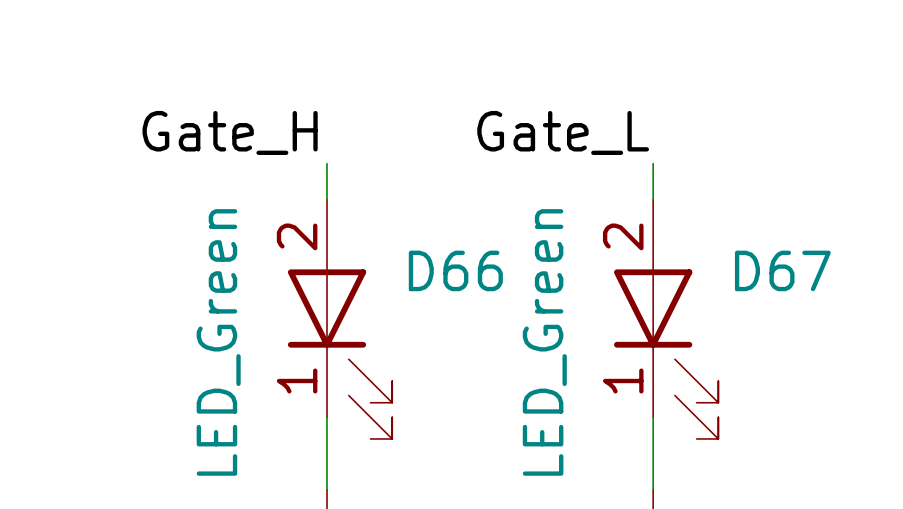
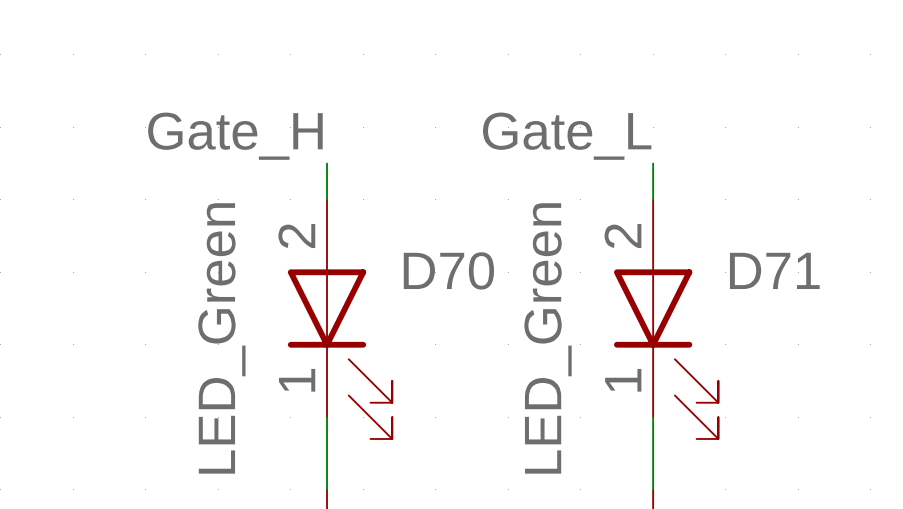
D66 name: D66 (455, 270) -> D70 (448, 270)
D67 name: D67 (782, 270) -> D71 (774, 270)

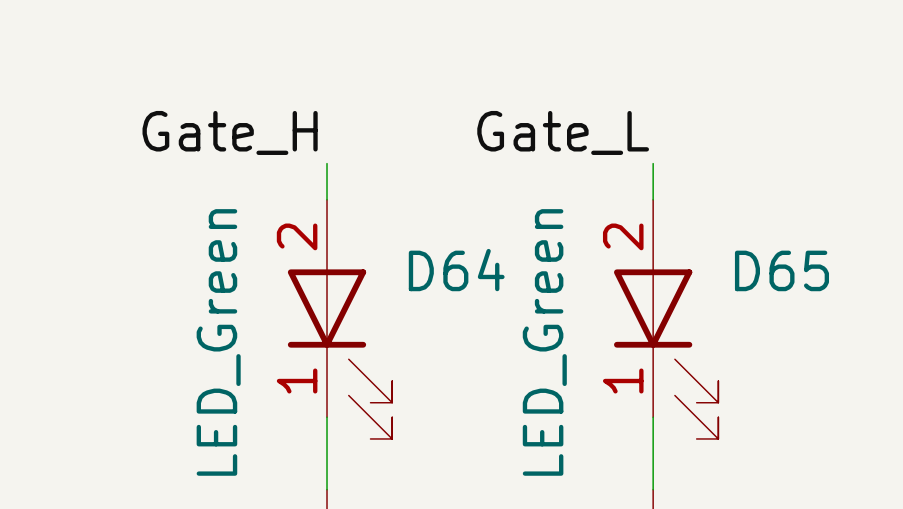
D70 name: D70 (448, 270) -> D64 (456, 270)
D71 name: D71 (774, 270) -> D65 (781, 270)

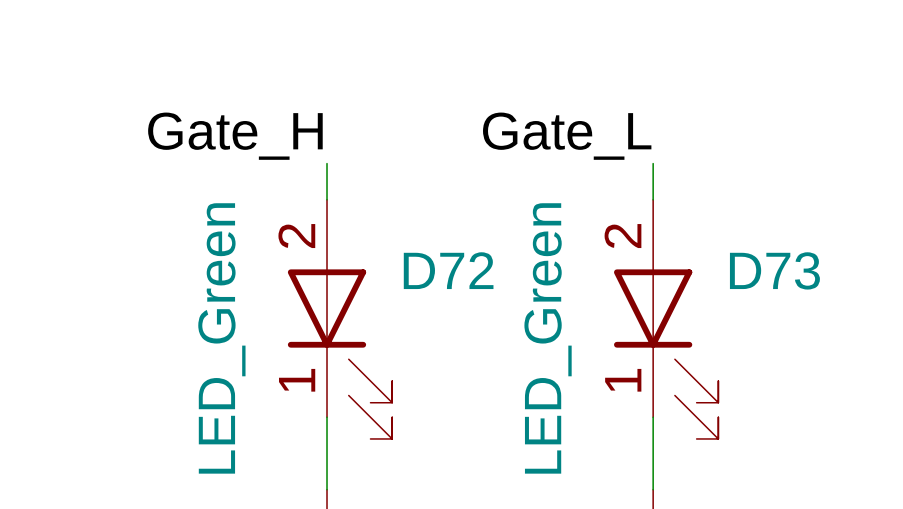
D64 name: D64 (456, 270) -> D72 (448, 270)
D65 name: D65 (781, 270) -> D73 (774, 270)

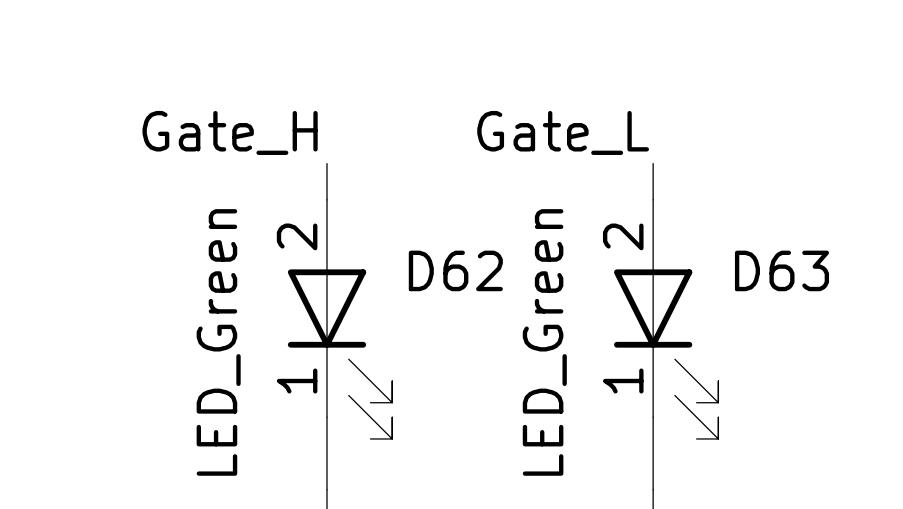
D72 name: D72 (448, 270) -> D62 (455, 270)
D73 name: D73 (774, 270) -> D63 (781, 270)

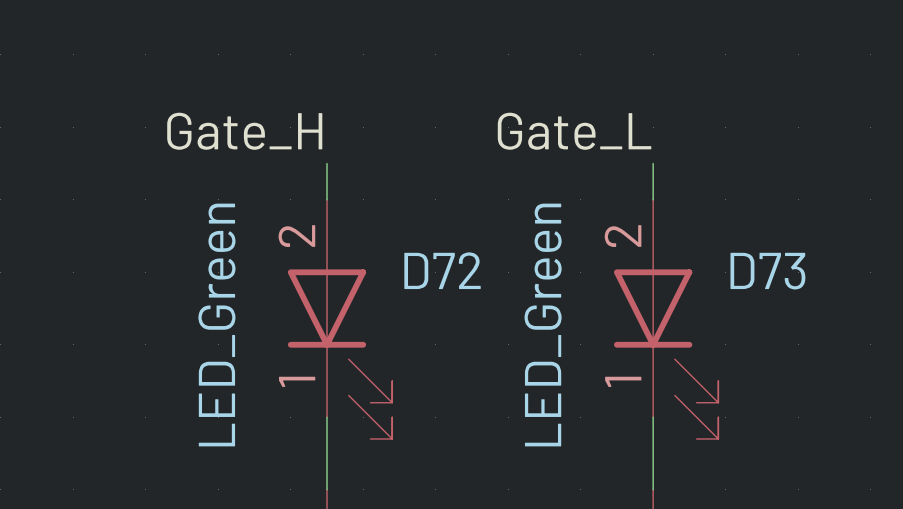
D62 name: D62 (455, 270) -> D72 (442, 270)
D63 name: D63 (781, 270) -> D73 (767, 271)

